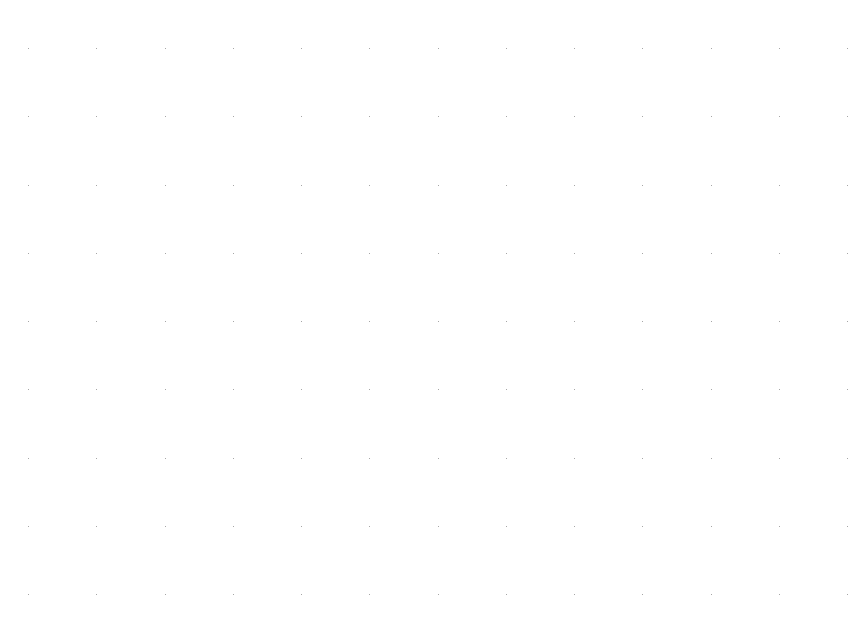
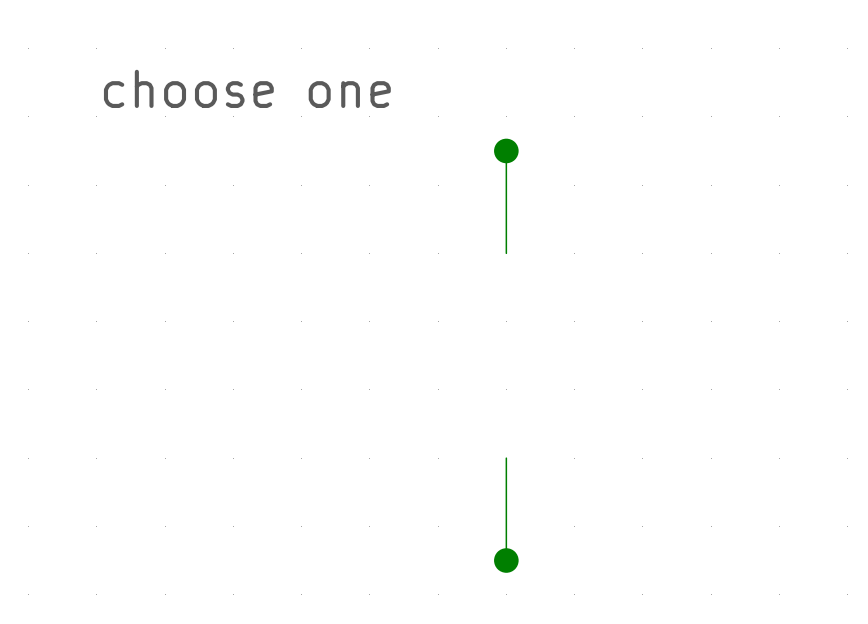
text: none -> choose one (247, 88)
wire: none -> (506, 150) (506, 253)
junction: none -> (506, 150)
wire: none -> (506, 458) (506, 560)
junction: none -> (506, 560)

